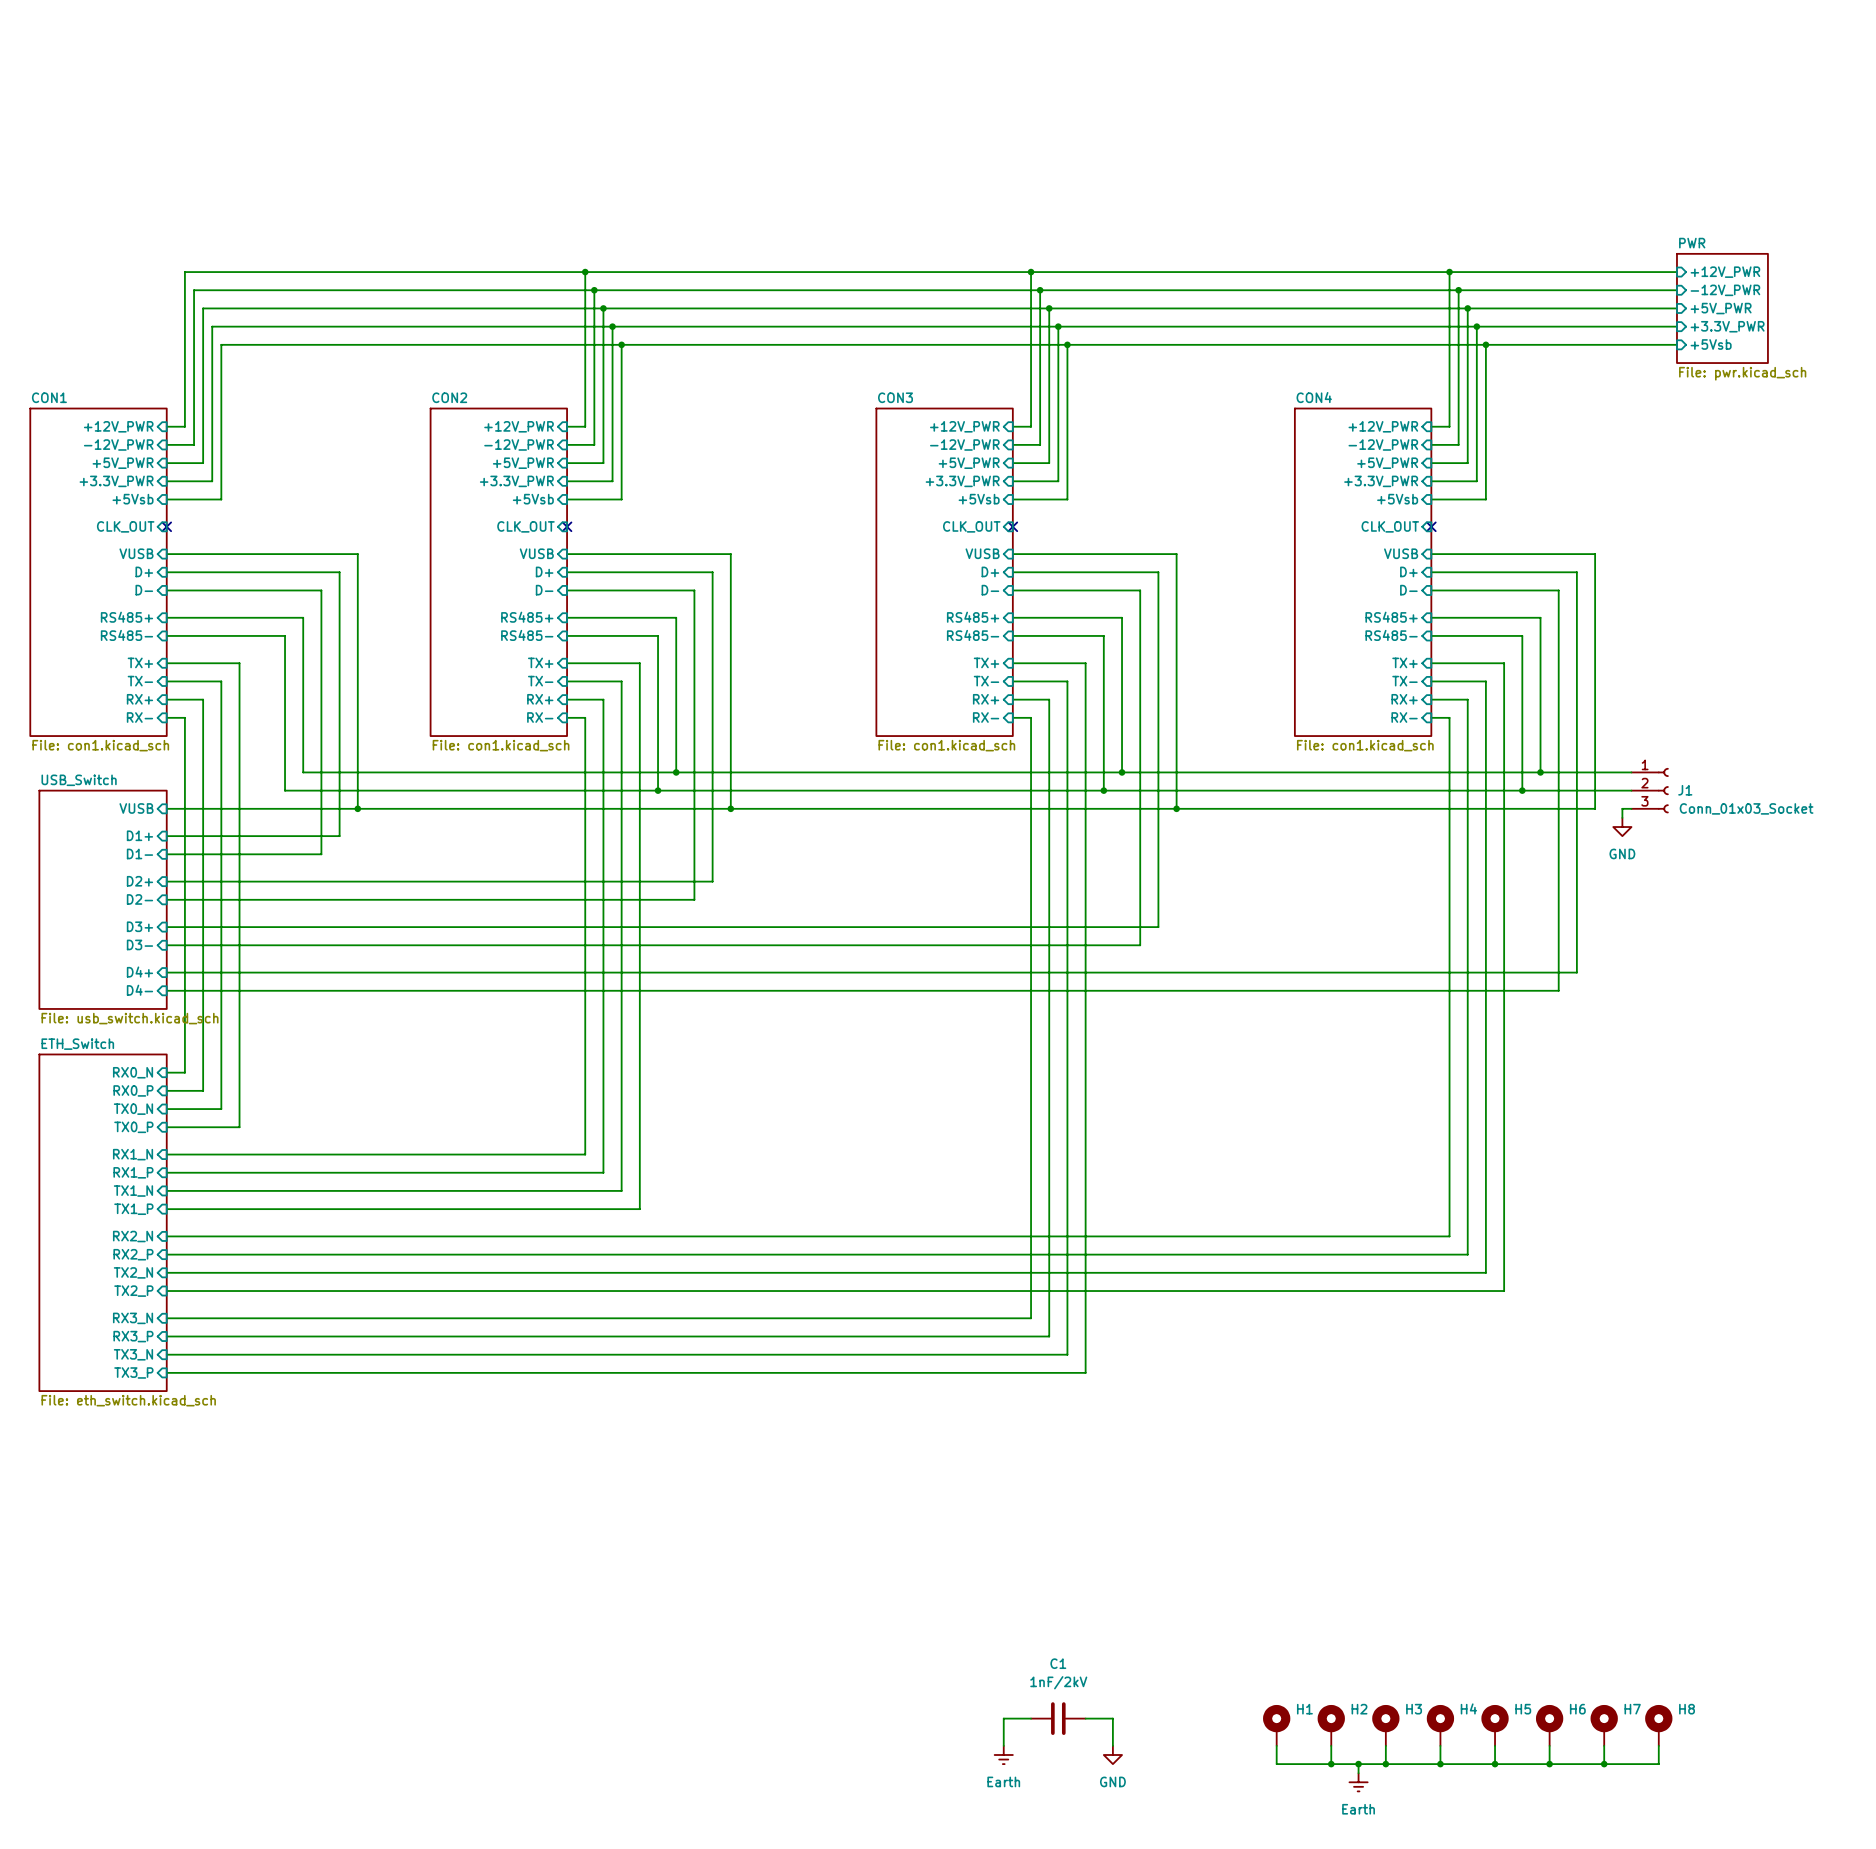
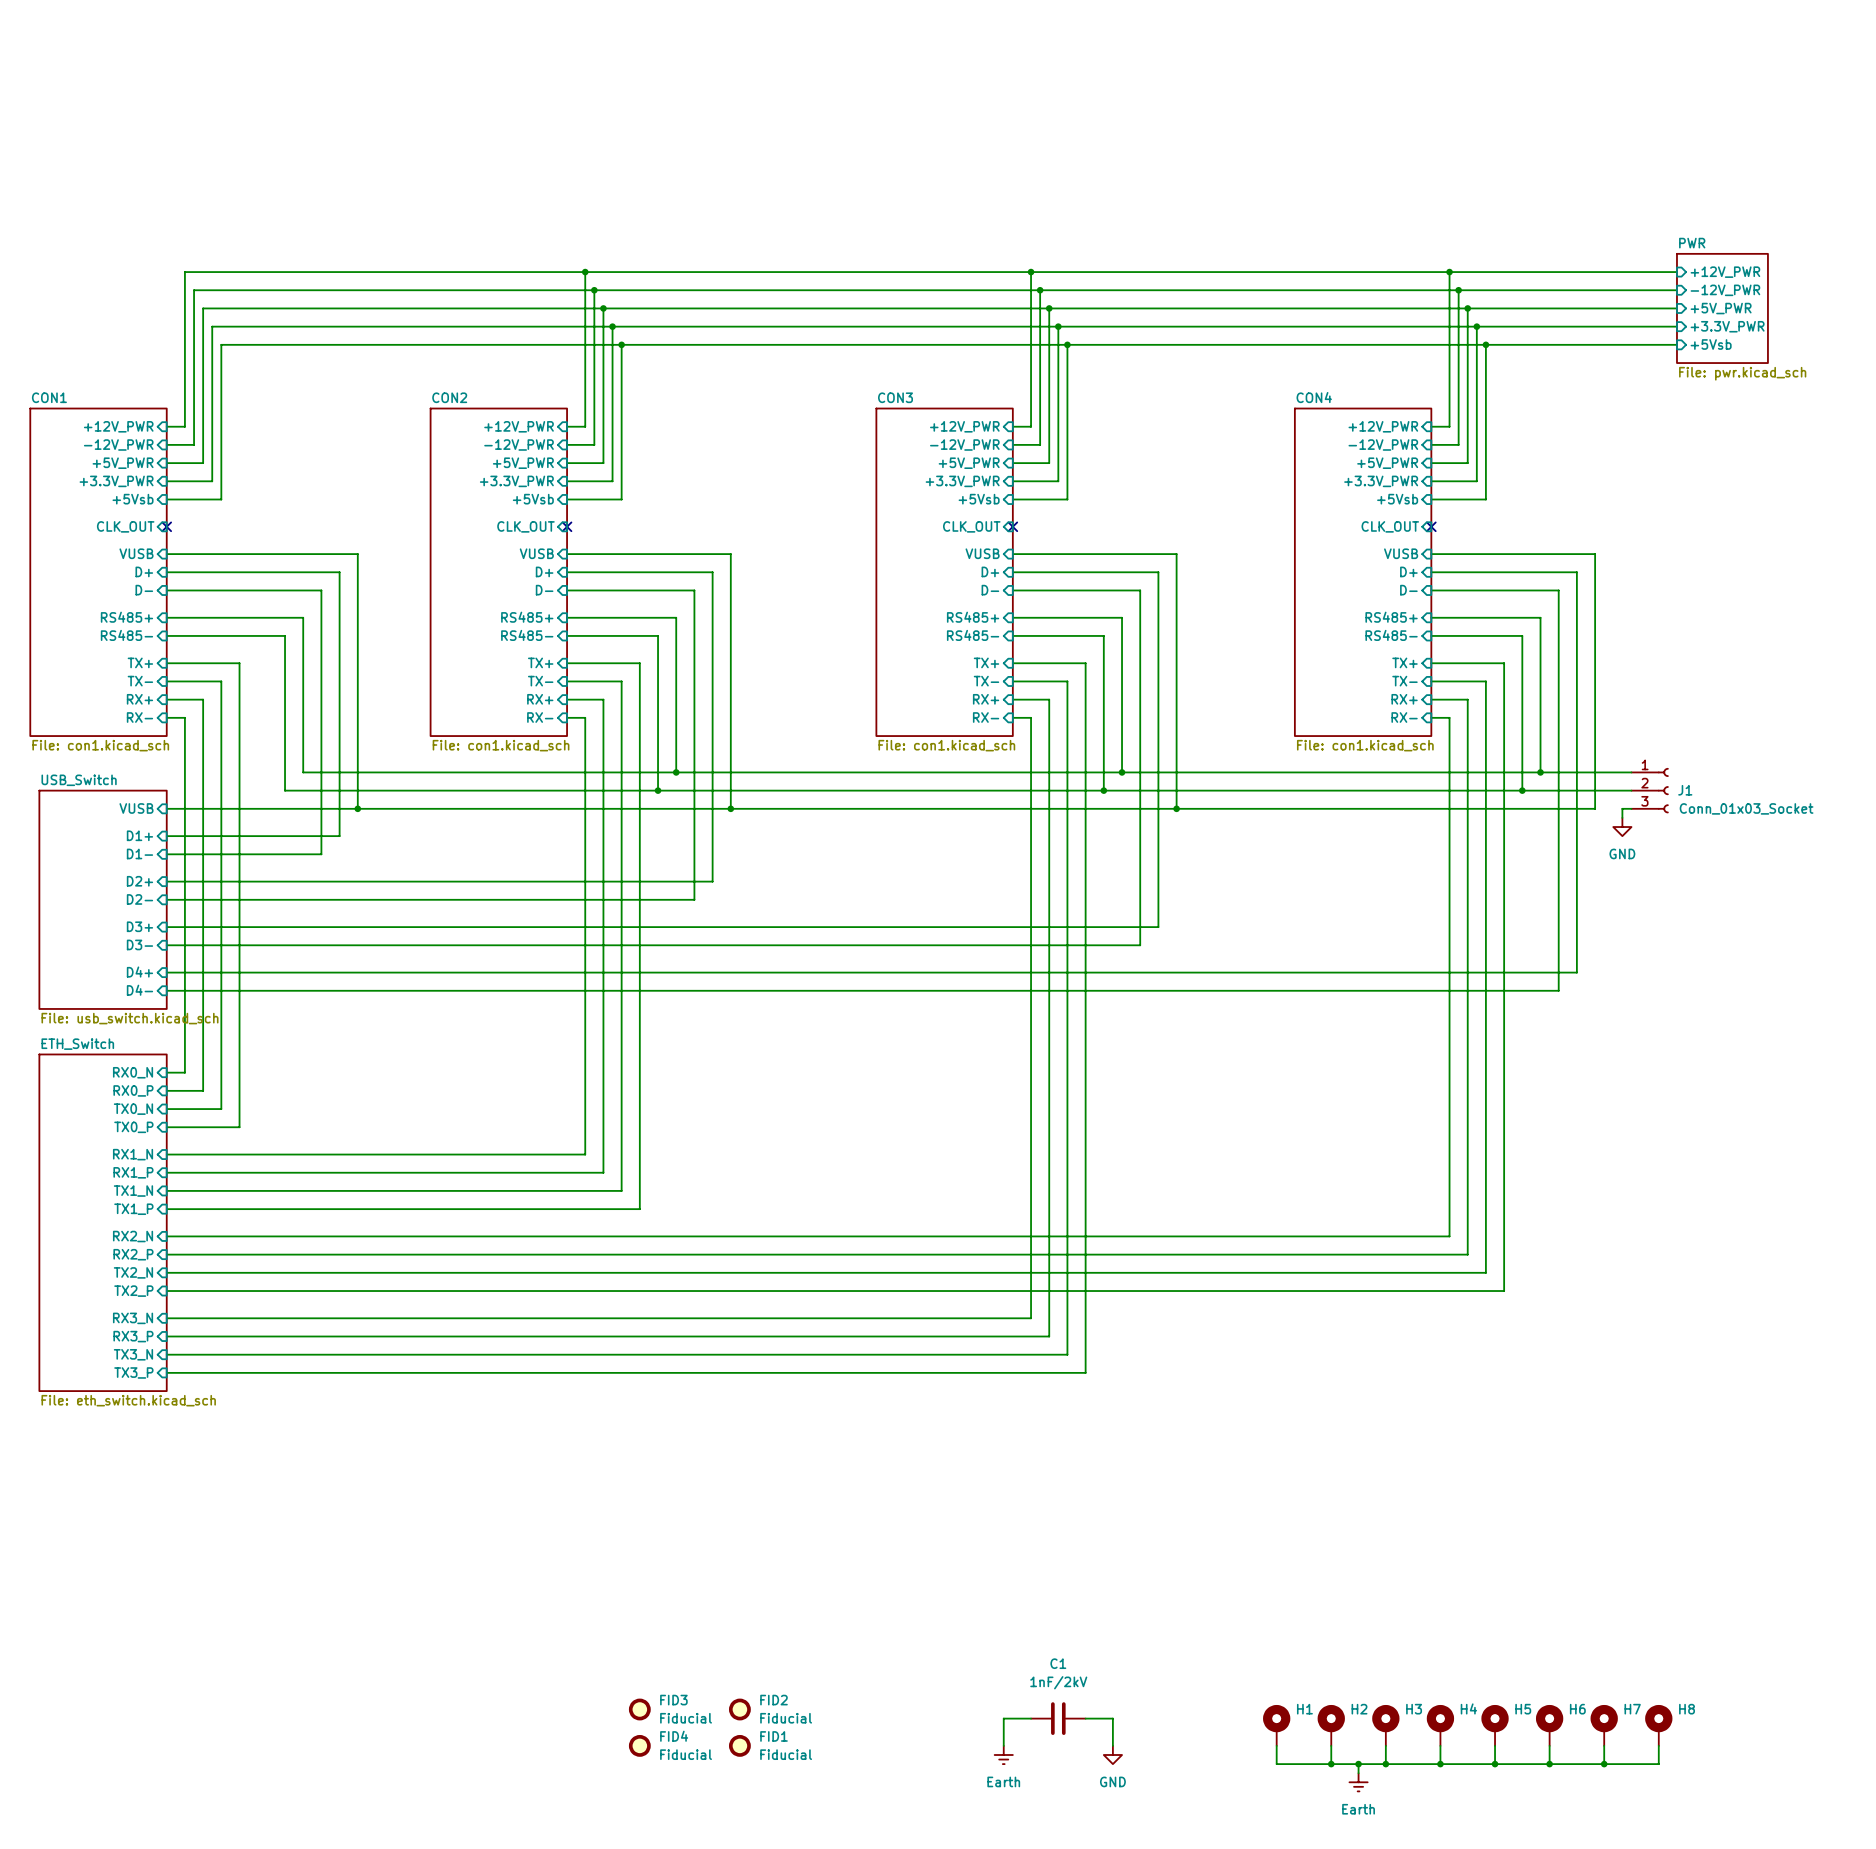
FID3: none -> Fiducial (639, 1709)
FID2: none -> Fiducial (739, 1709)
FID4: none -> Fiducial (639, 1745)
FID1: none -> Fiducial (739, 1745)

